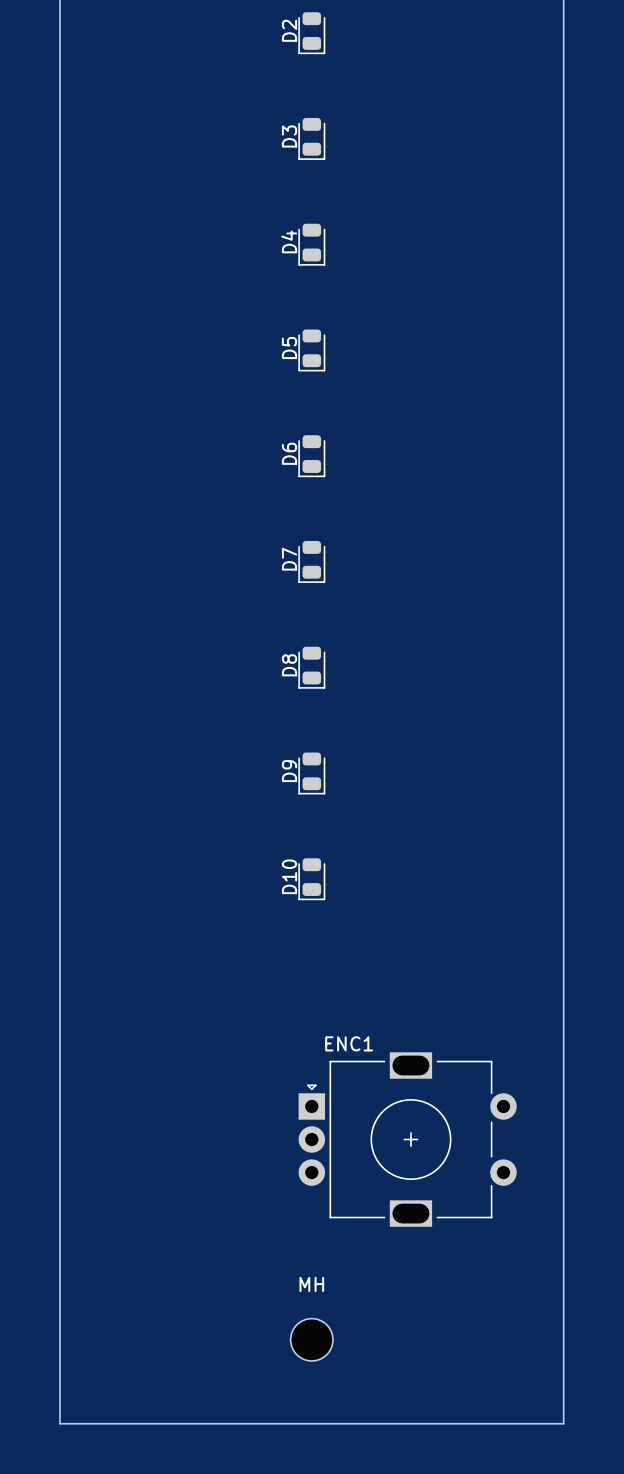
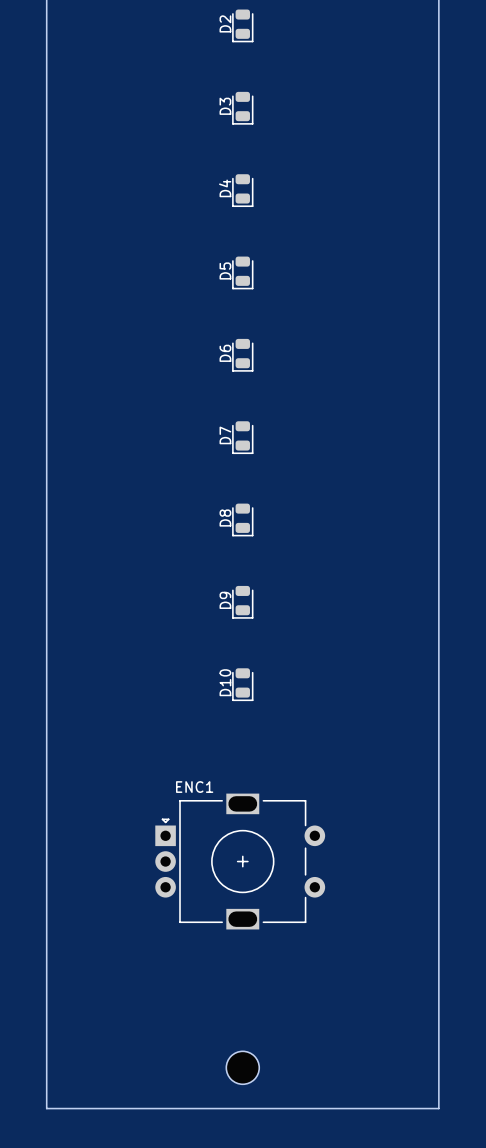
ENC1 position: (407, 1139) -> (240, 861)
MH: (311, 1339) -> none
part: none -> (242, 1067)

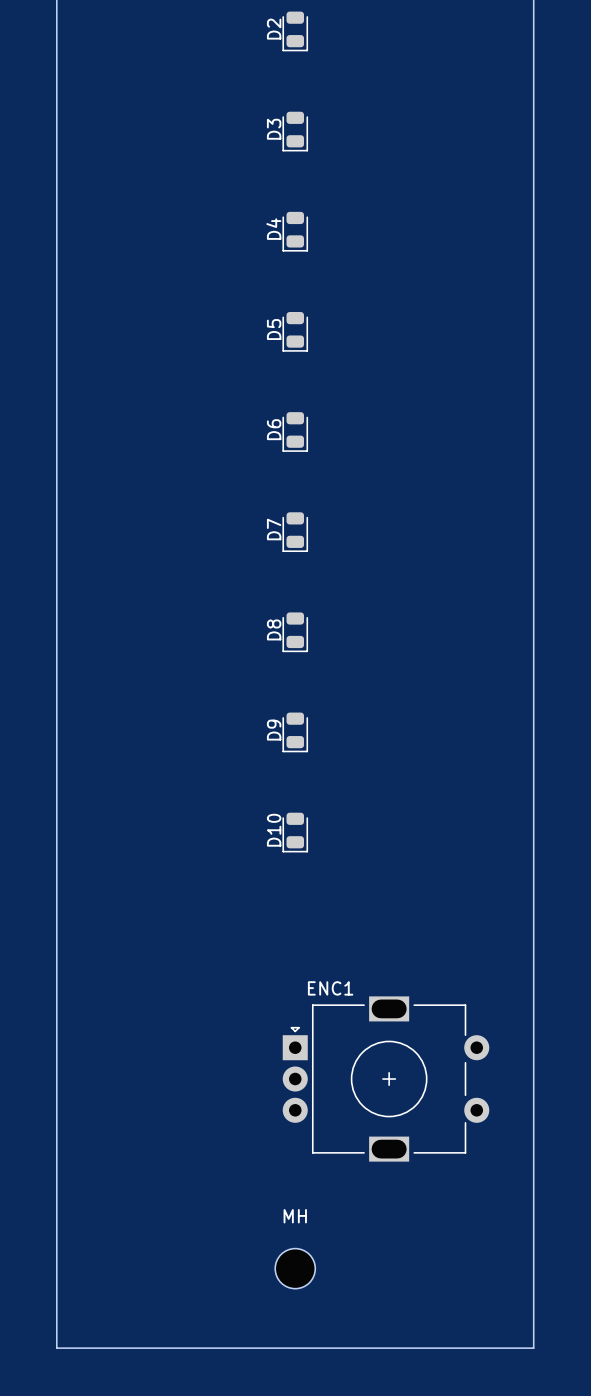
ENC1 position: (240, 861) -> (386, 1079)
MH: none -> (295, 1268)
part: (242, 1067) -> none

